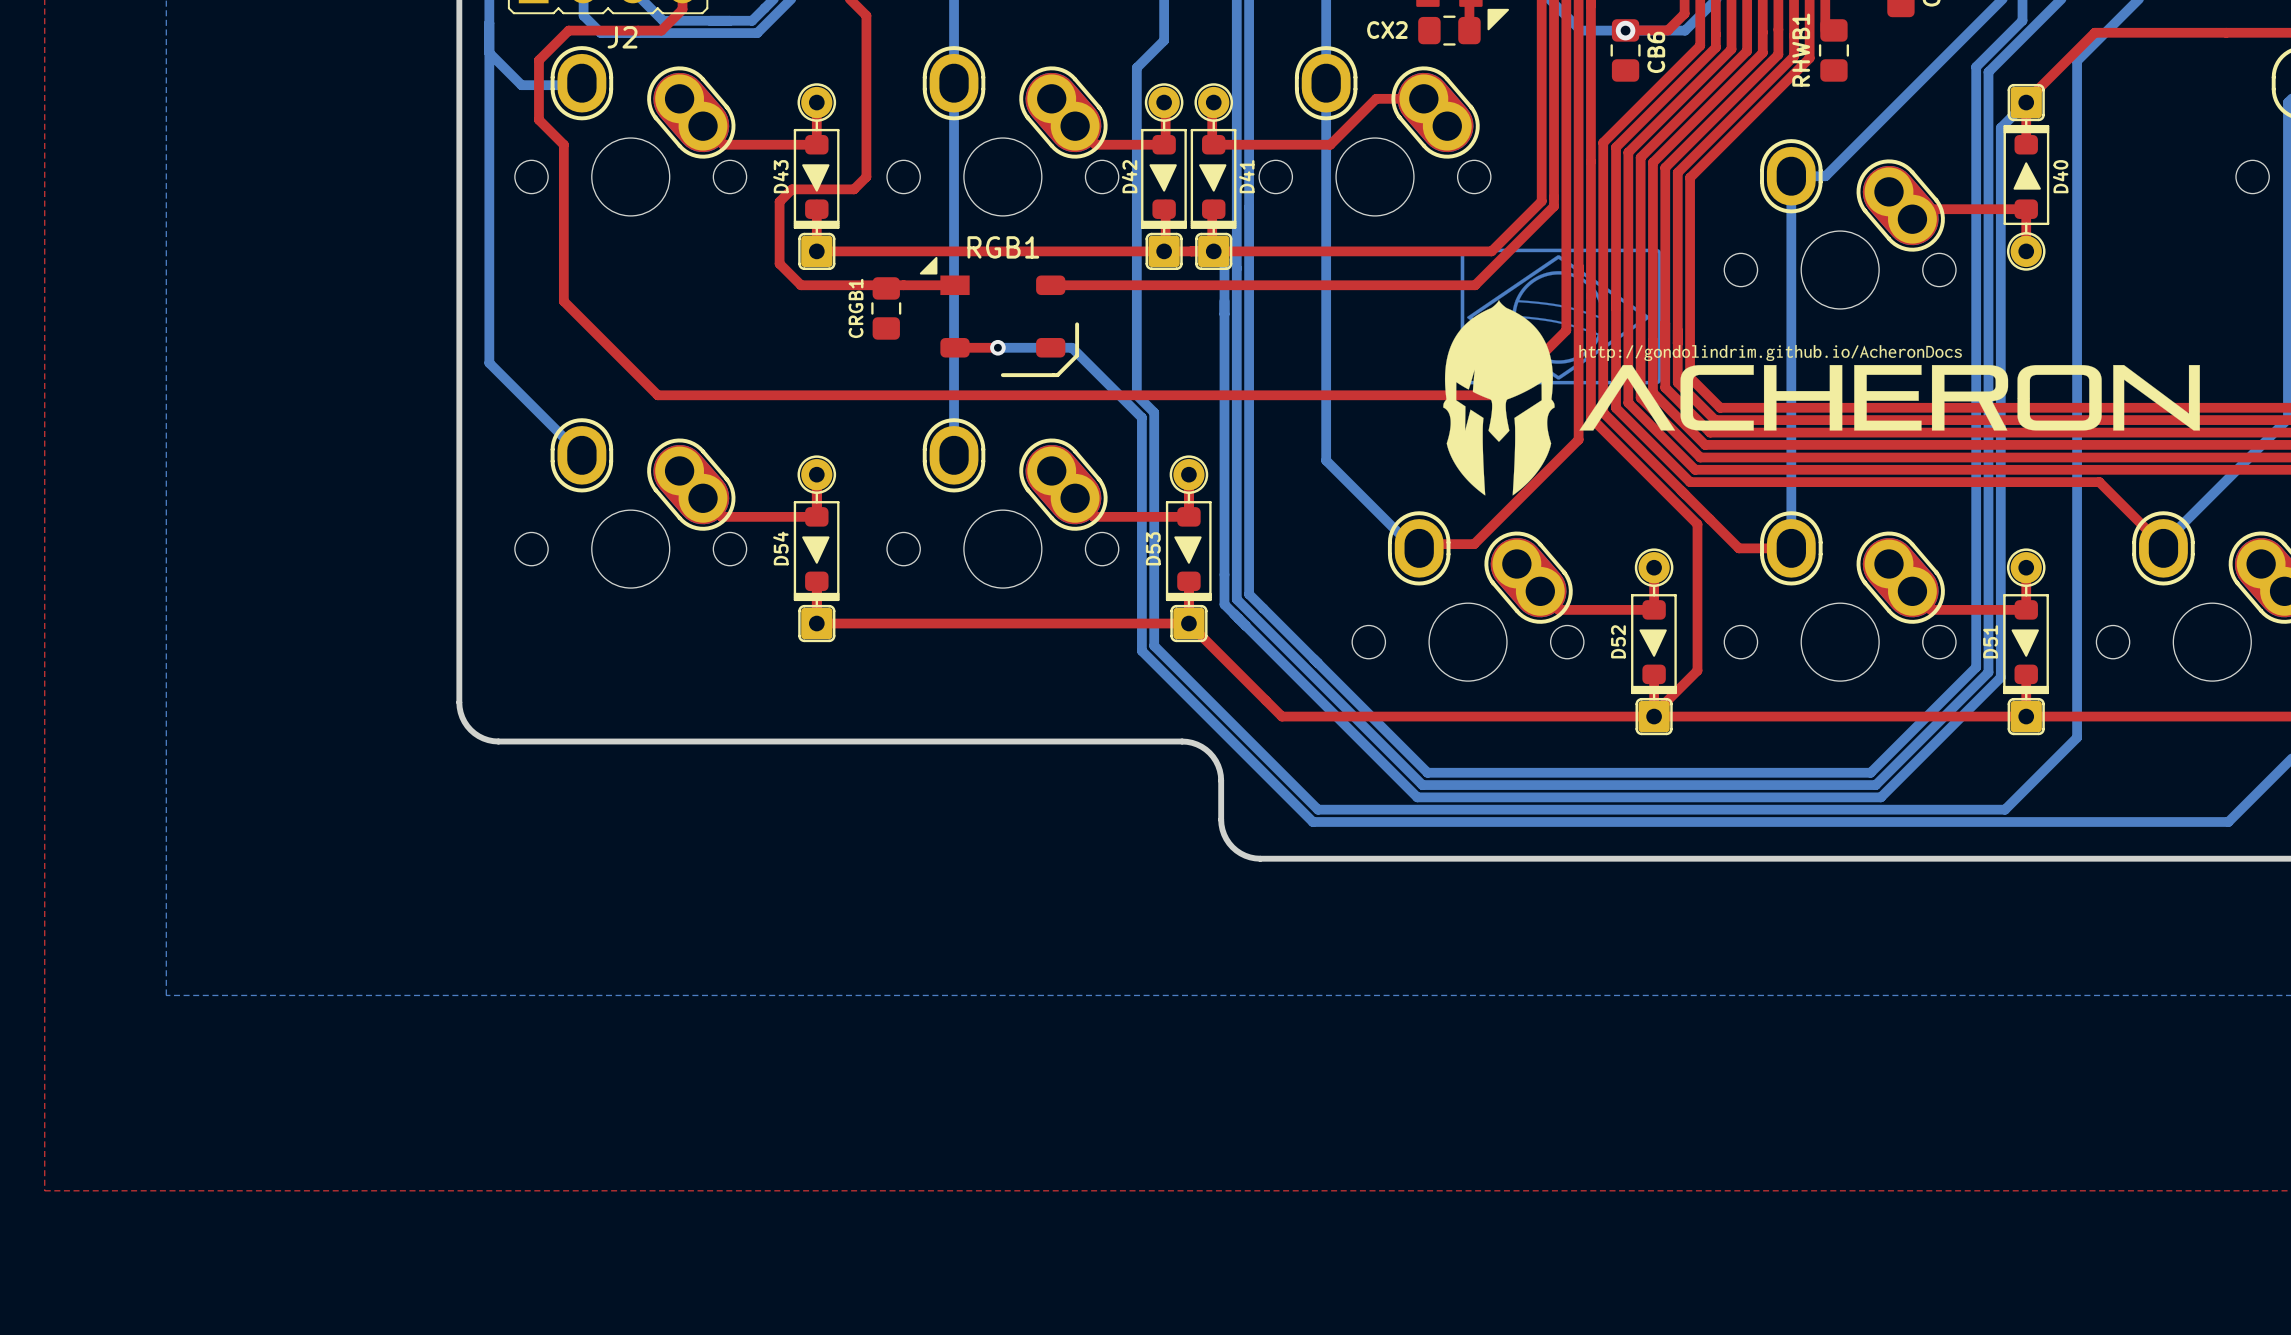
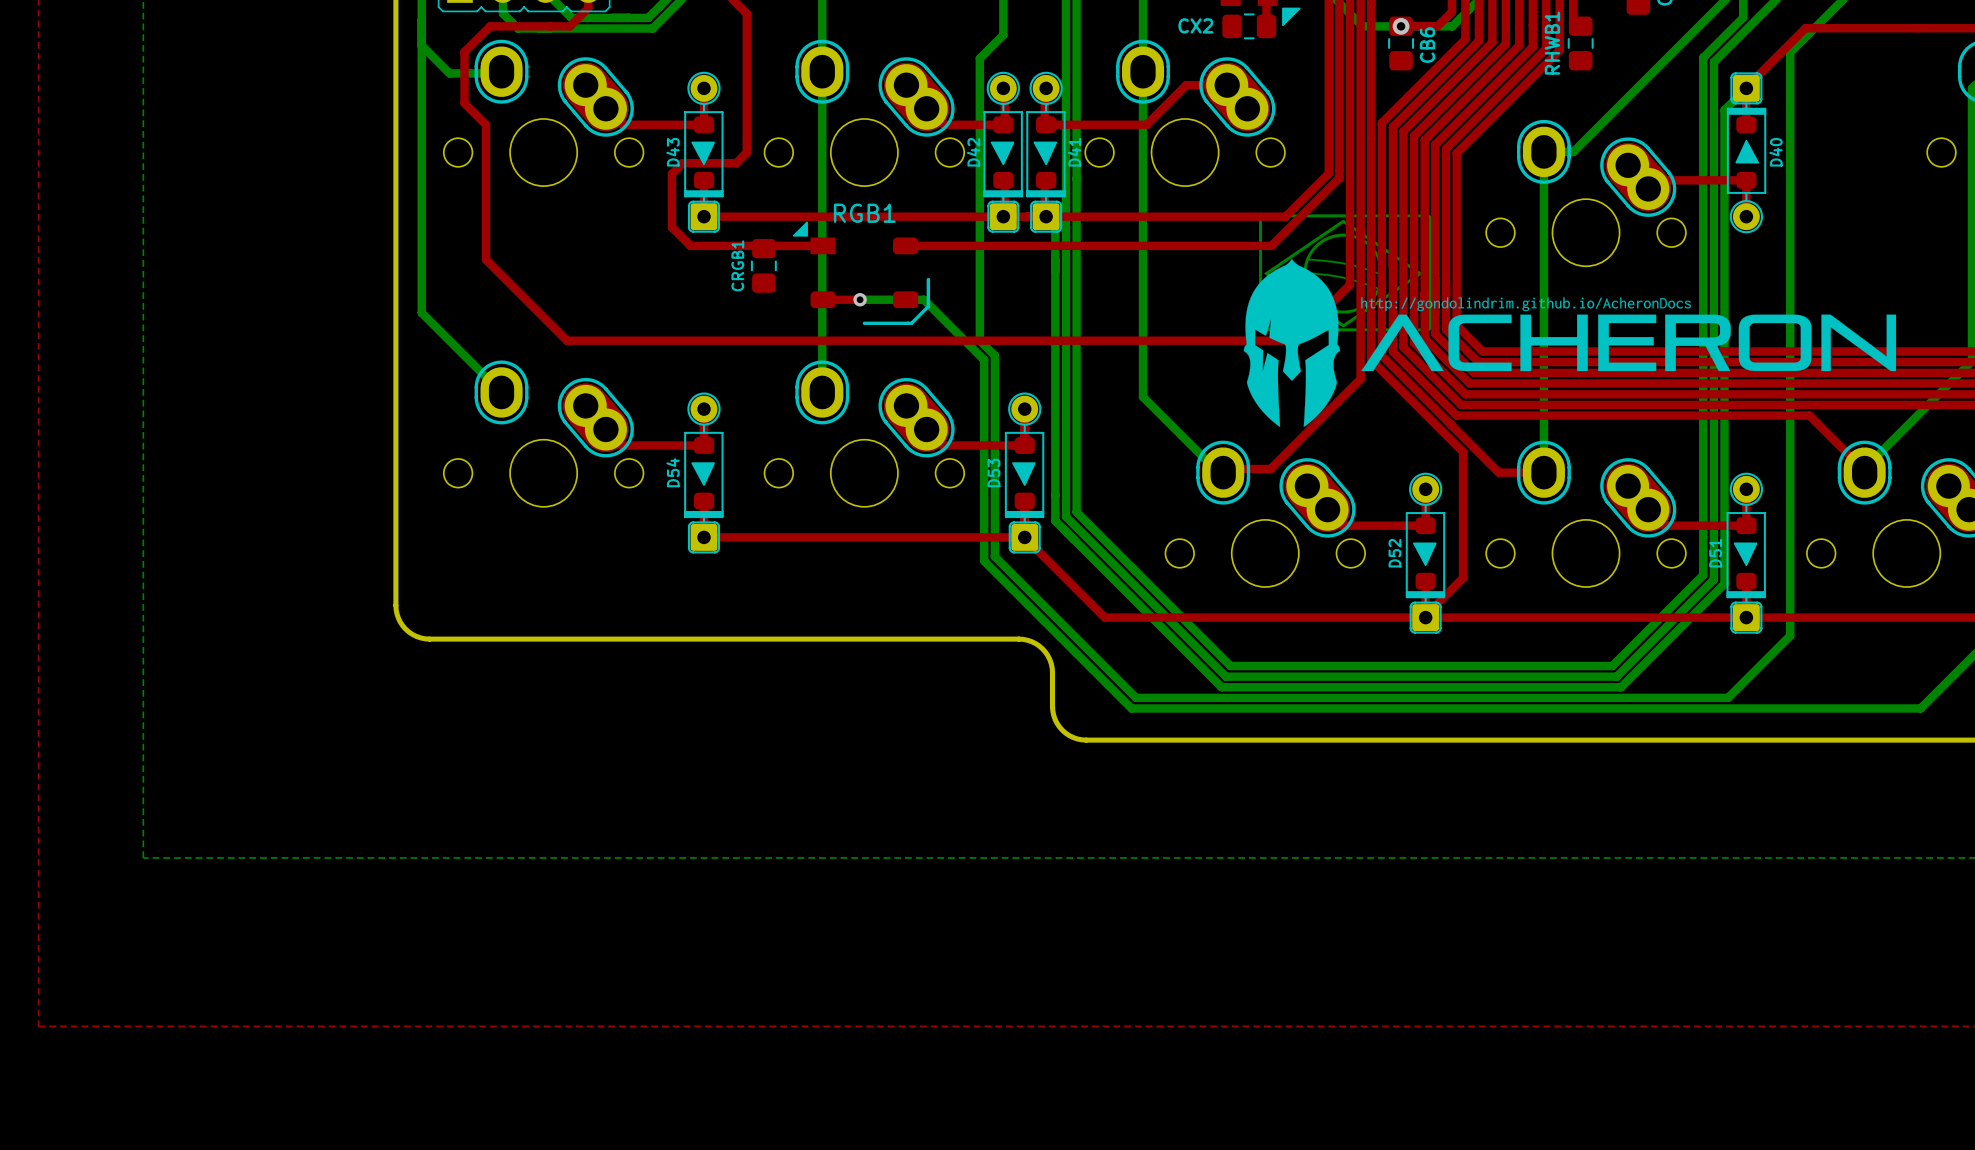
J2 name: J2 (622, 37) -> none

